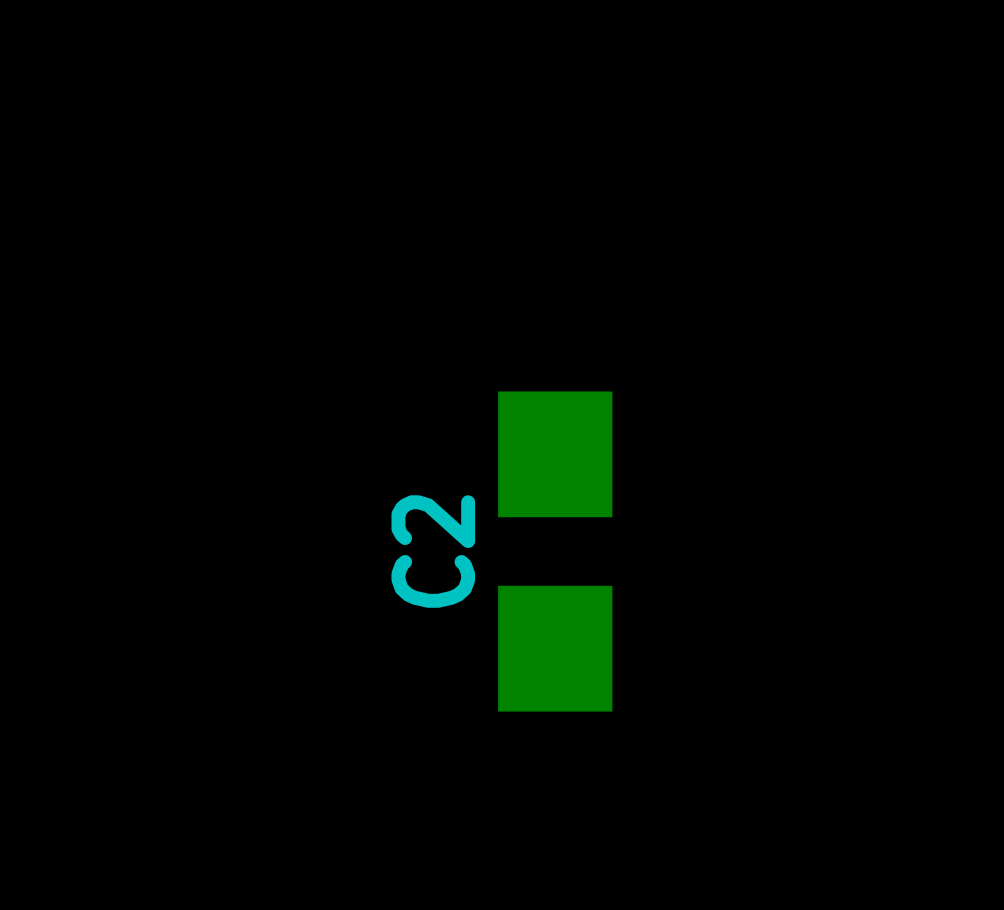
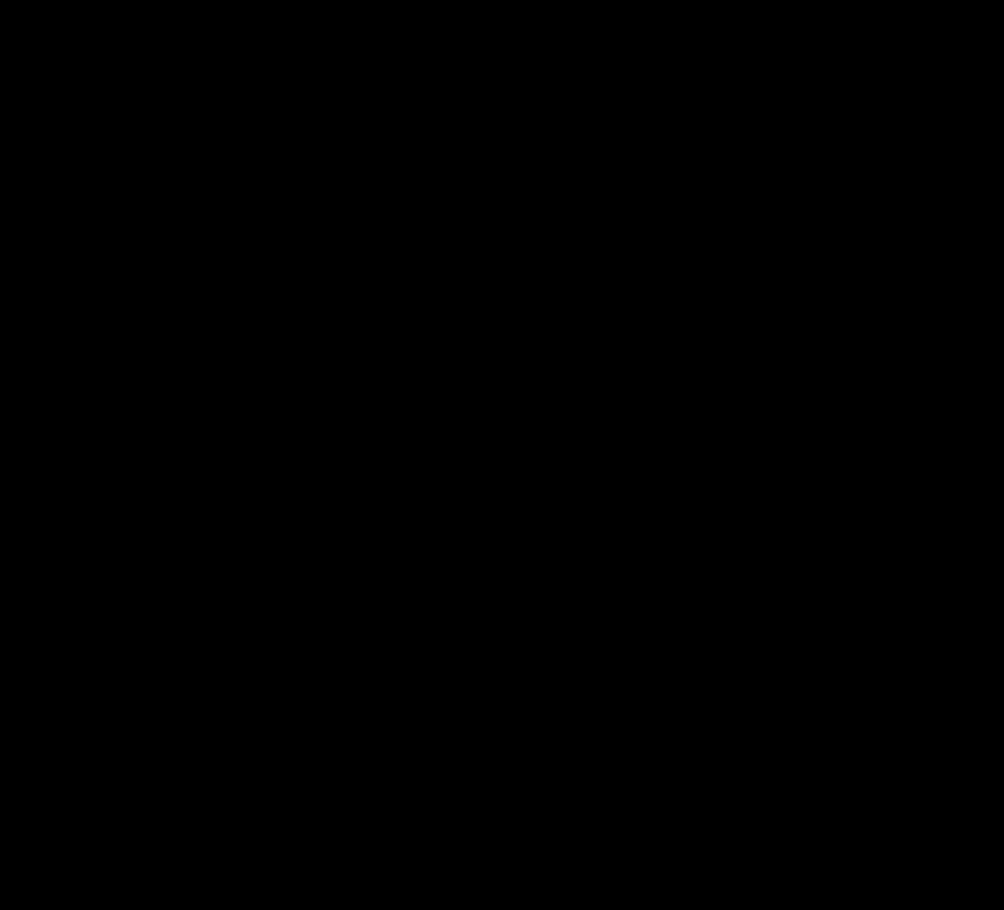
C2: (555, 551) -> none

